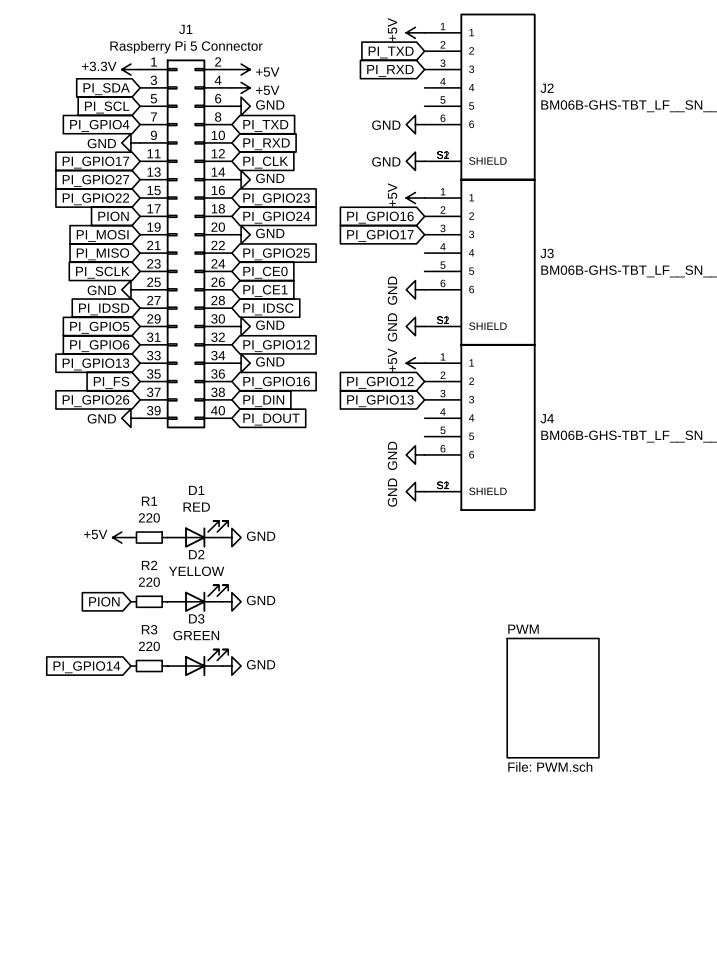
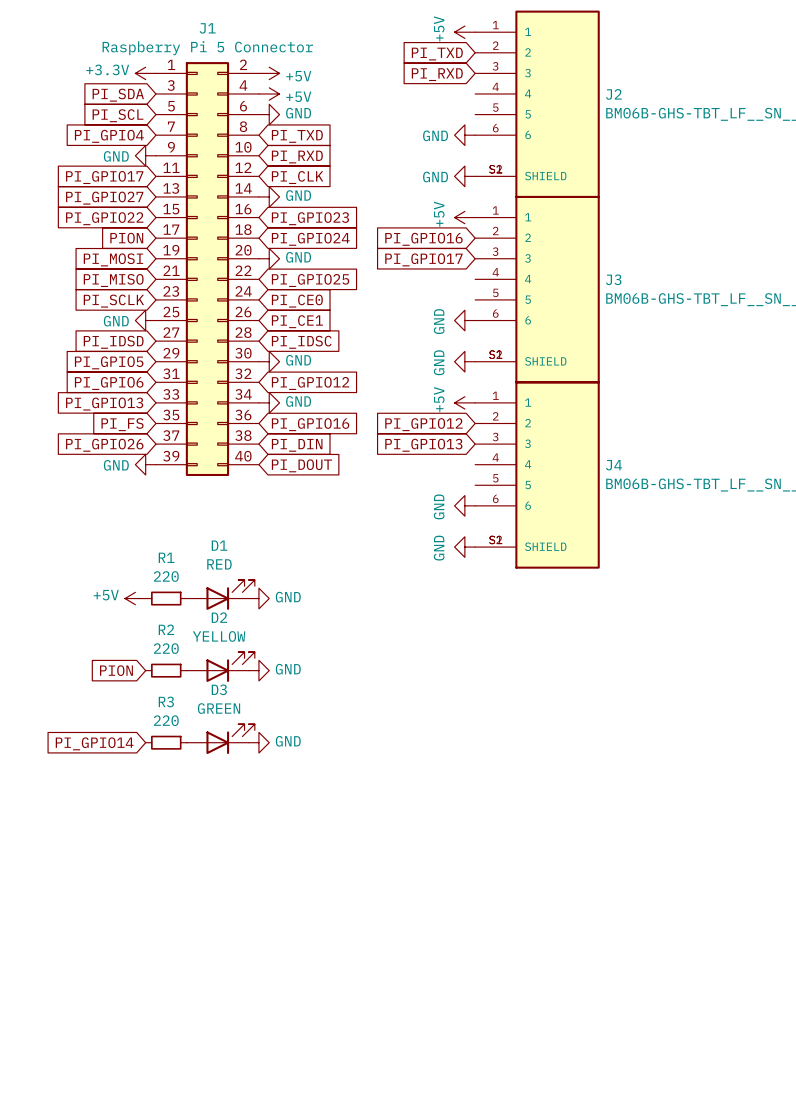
sheet PWM: File: PWM.sch (553, 698) -> none

